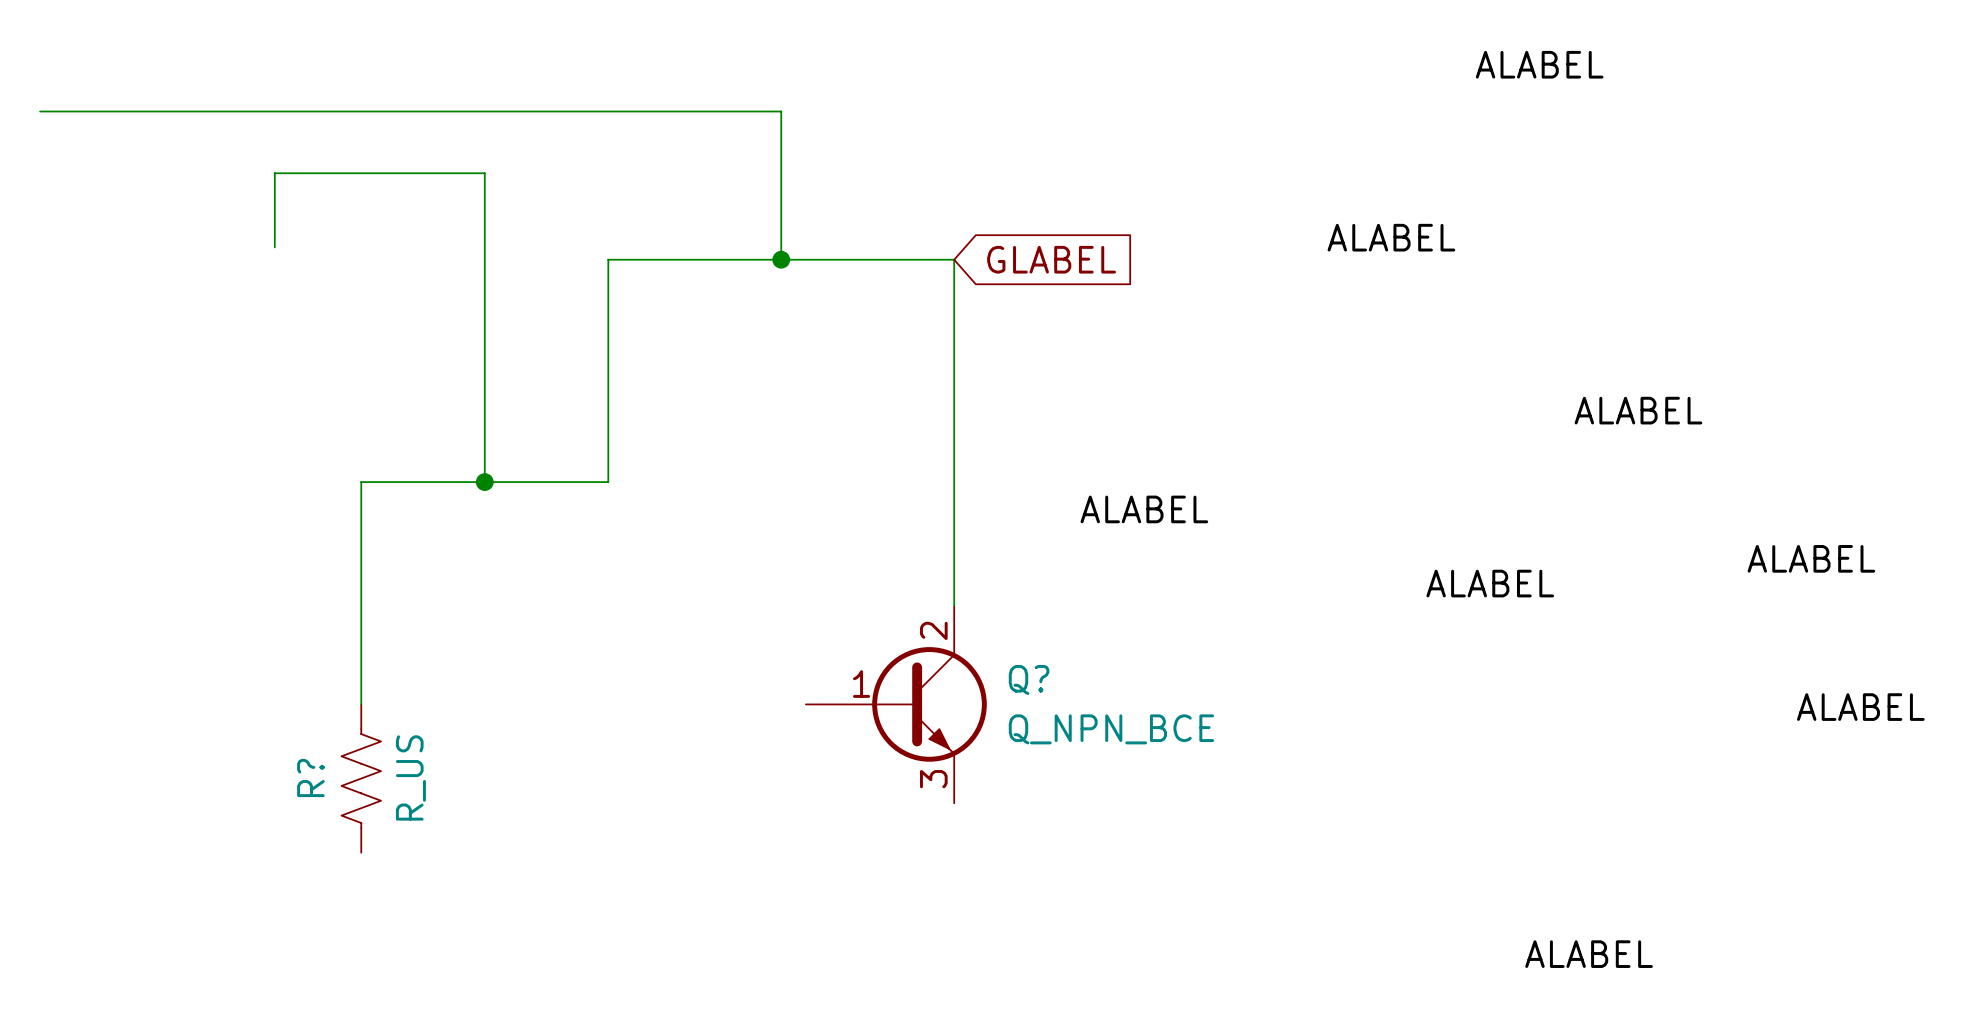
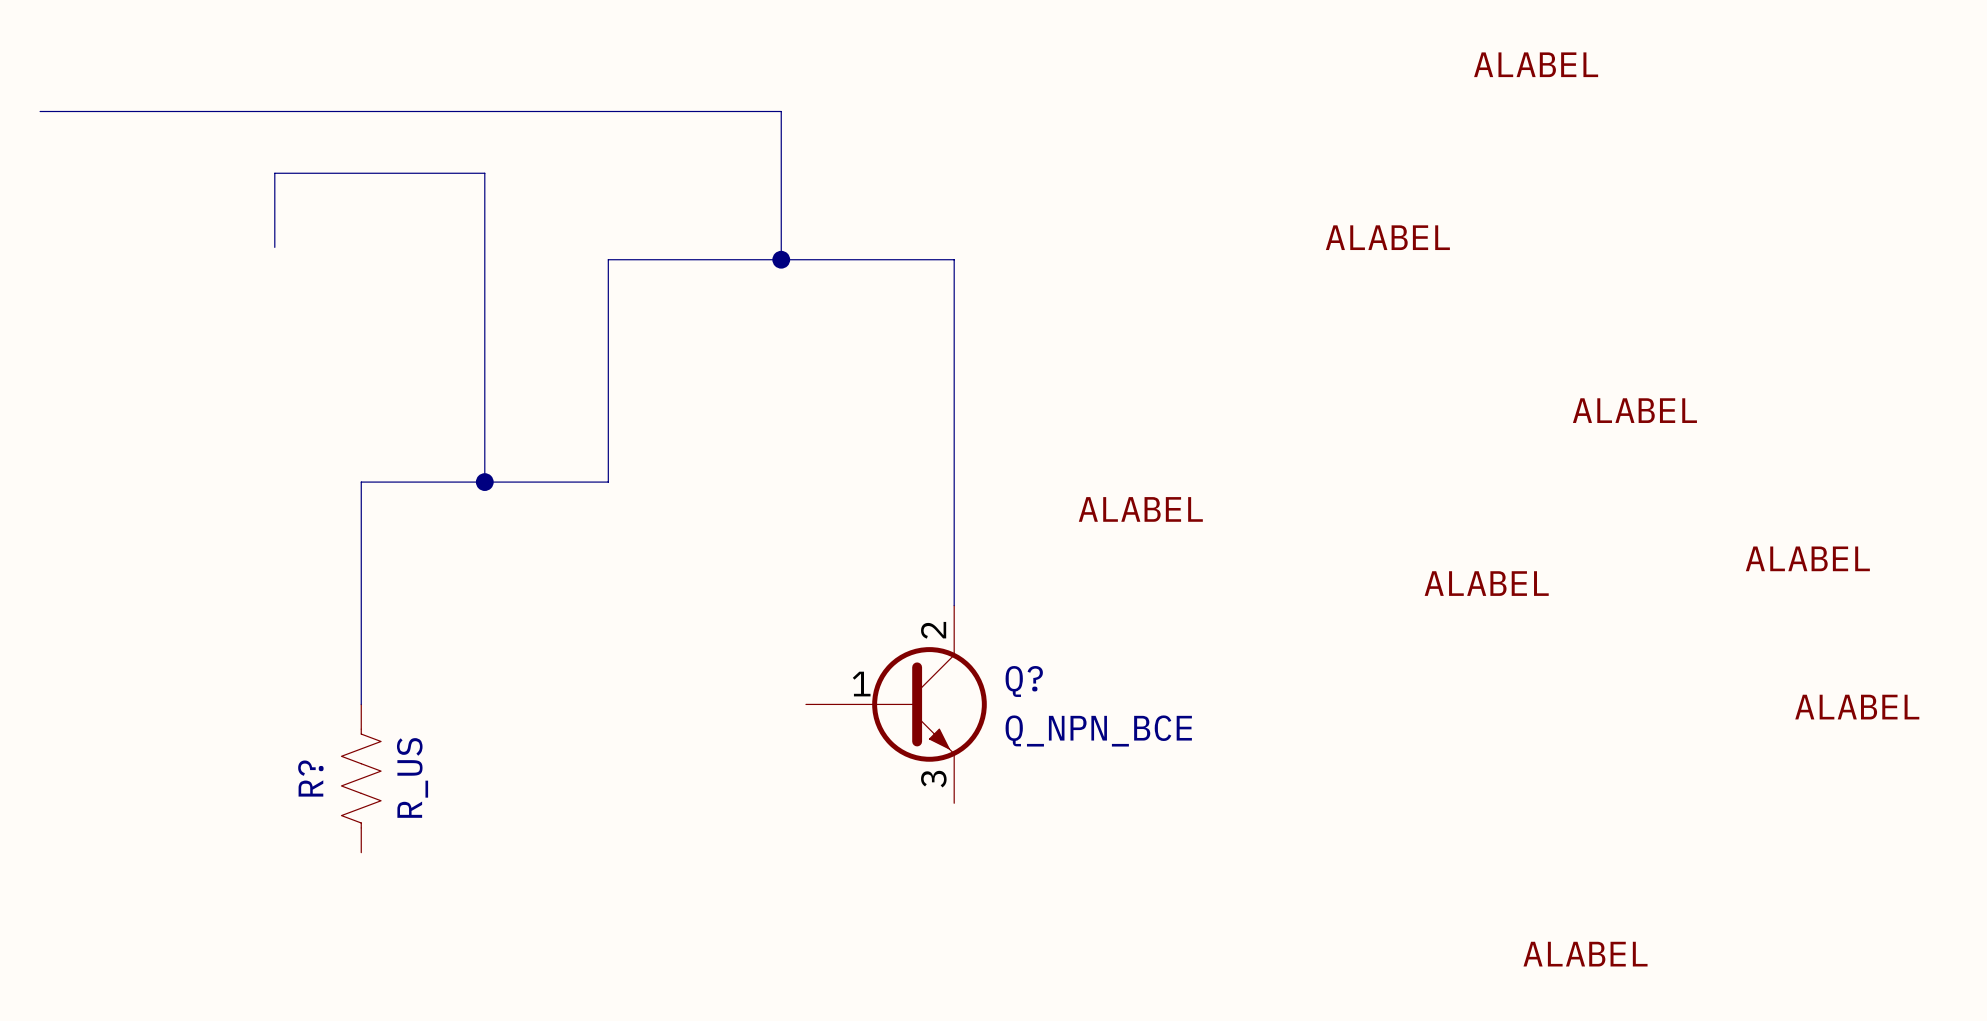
global label: GLABEL (1051, 259) -> none

